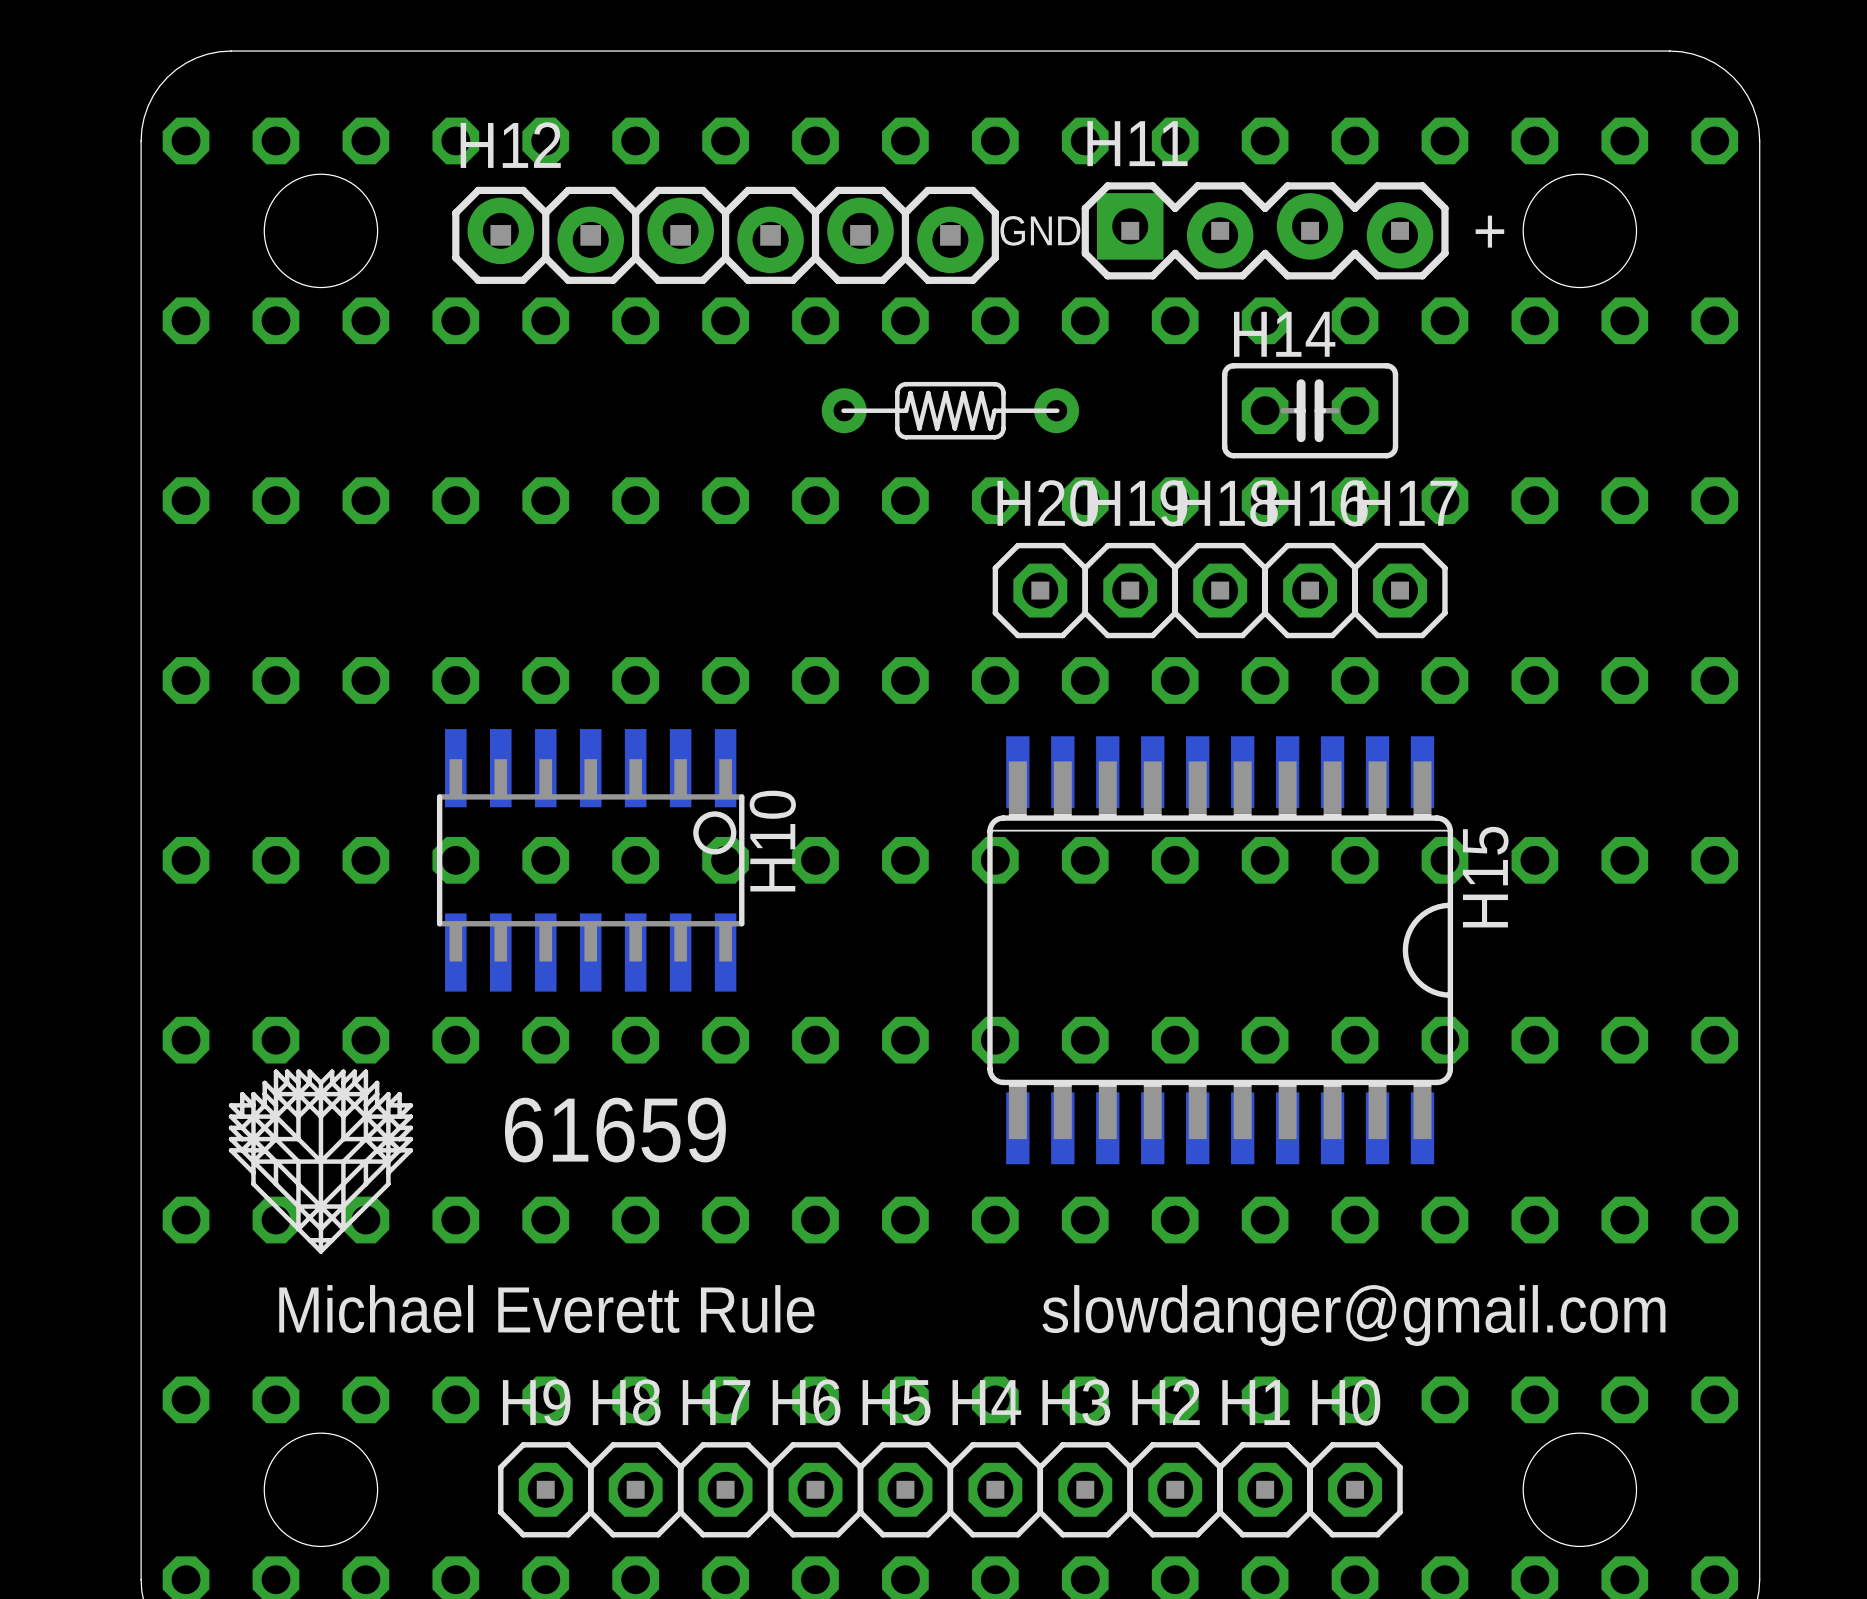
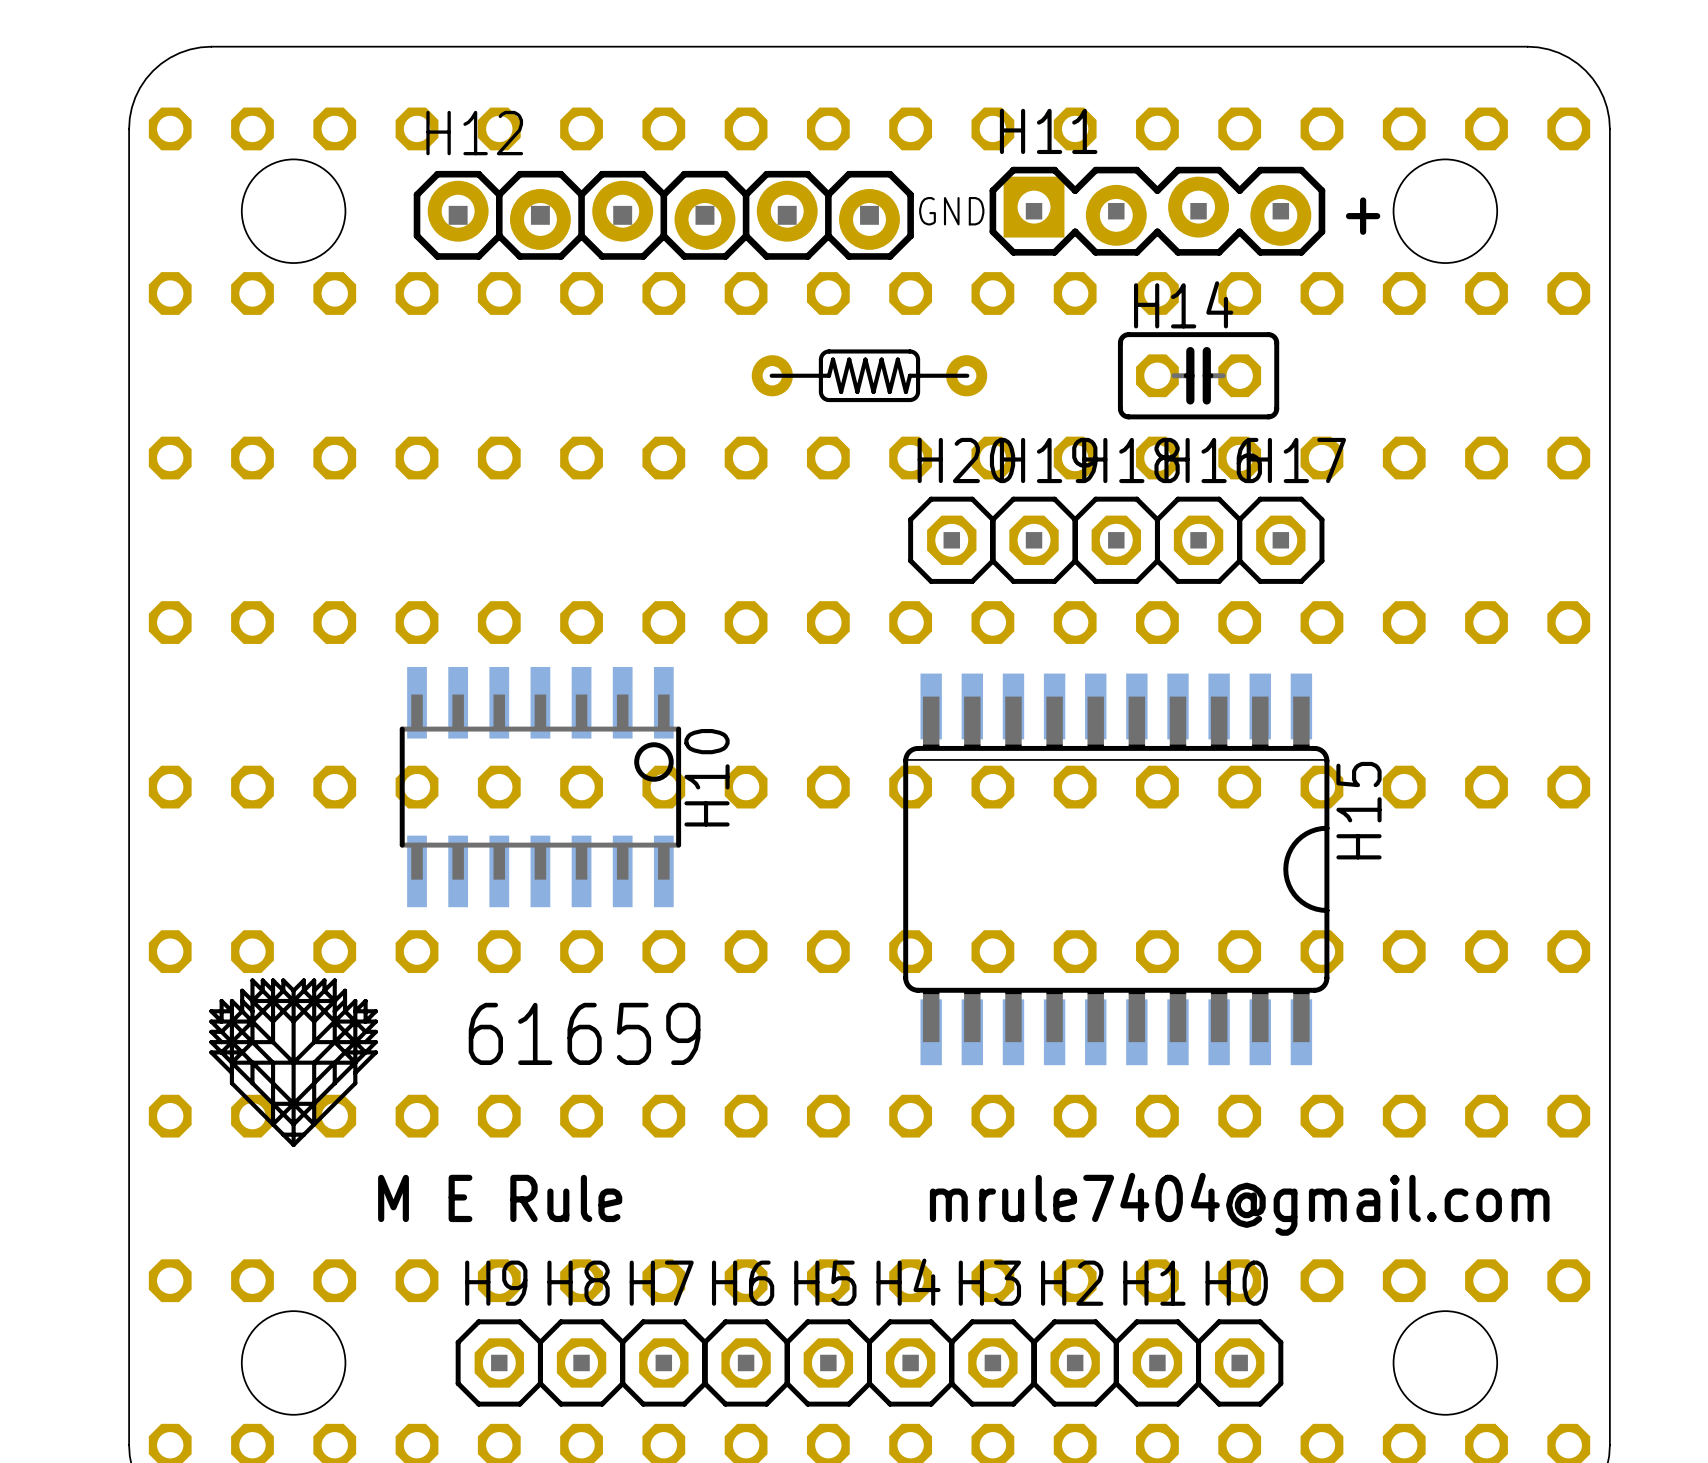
text: Michael Everett Rule (546, 1309) -> M E Rule (500, 1198)
text: slowdanger@gmail.com (1353, 1315) -> mrule7404@gmail.com (1239, 1204)

